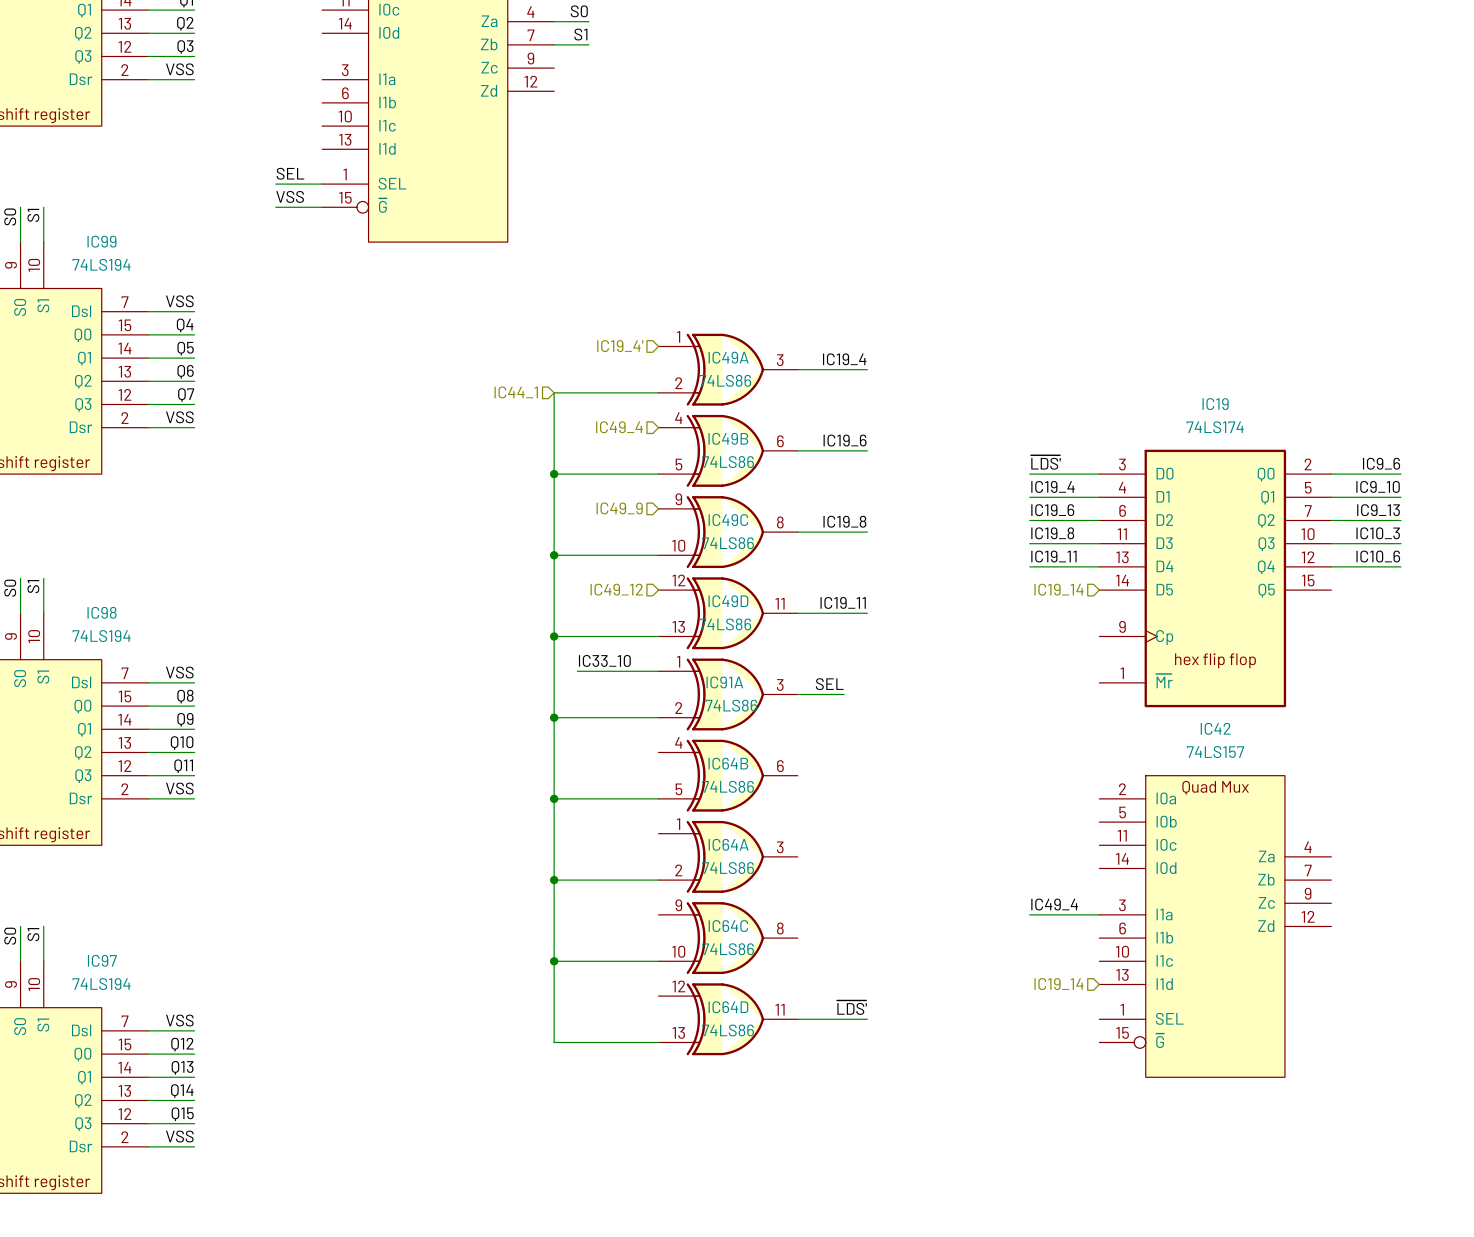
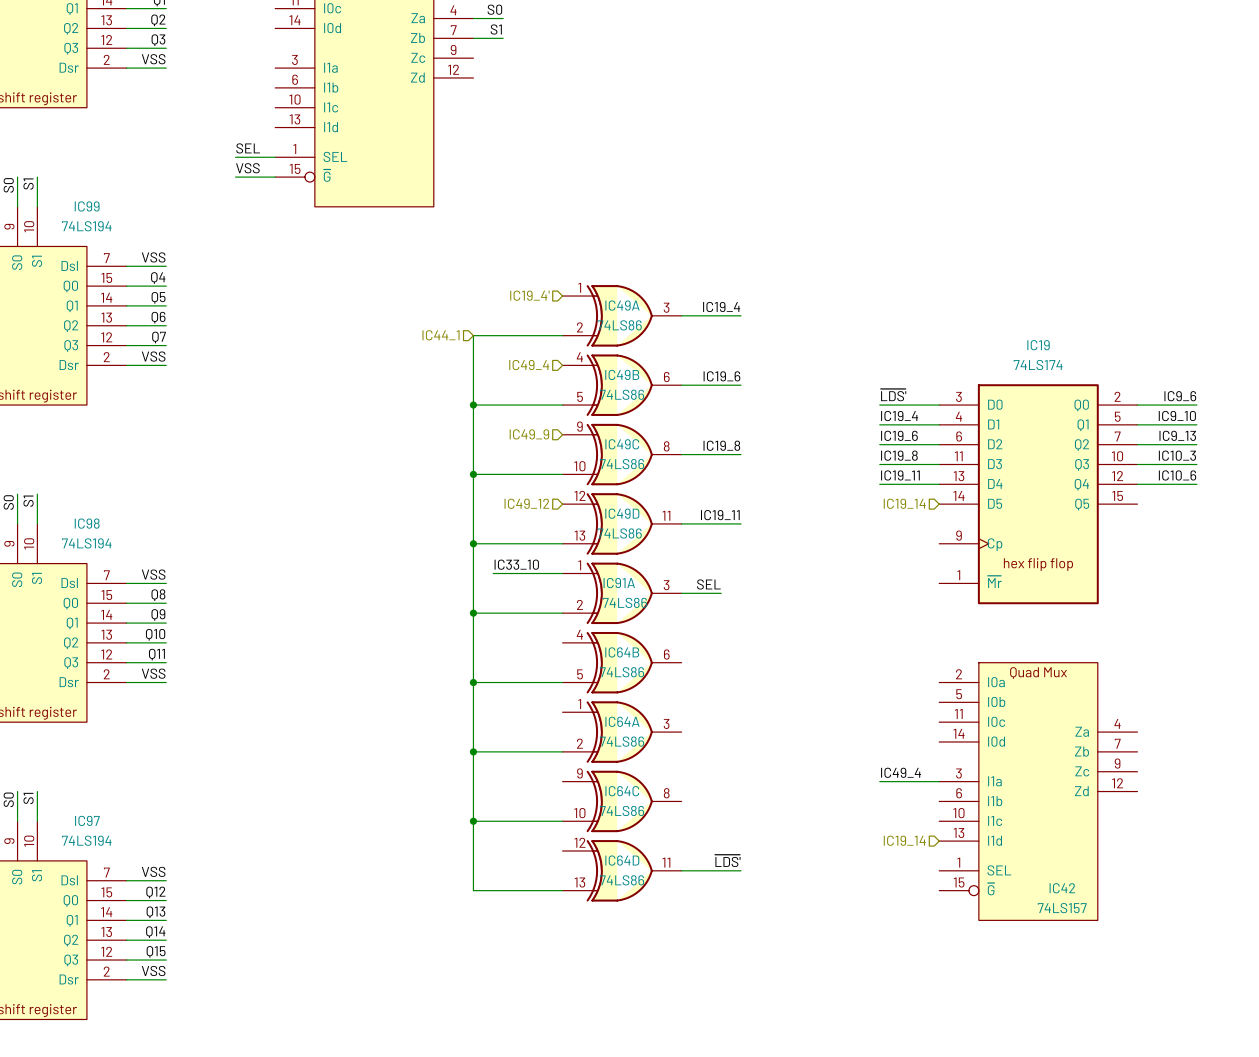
IC42 name position: IC42 (1215, 728) -> IC42 (1062, 888)
IC42 value position: 74LS157 (1215, 752) -> 74LS157 (1062, 908)

